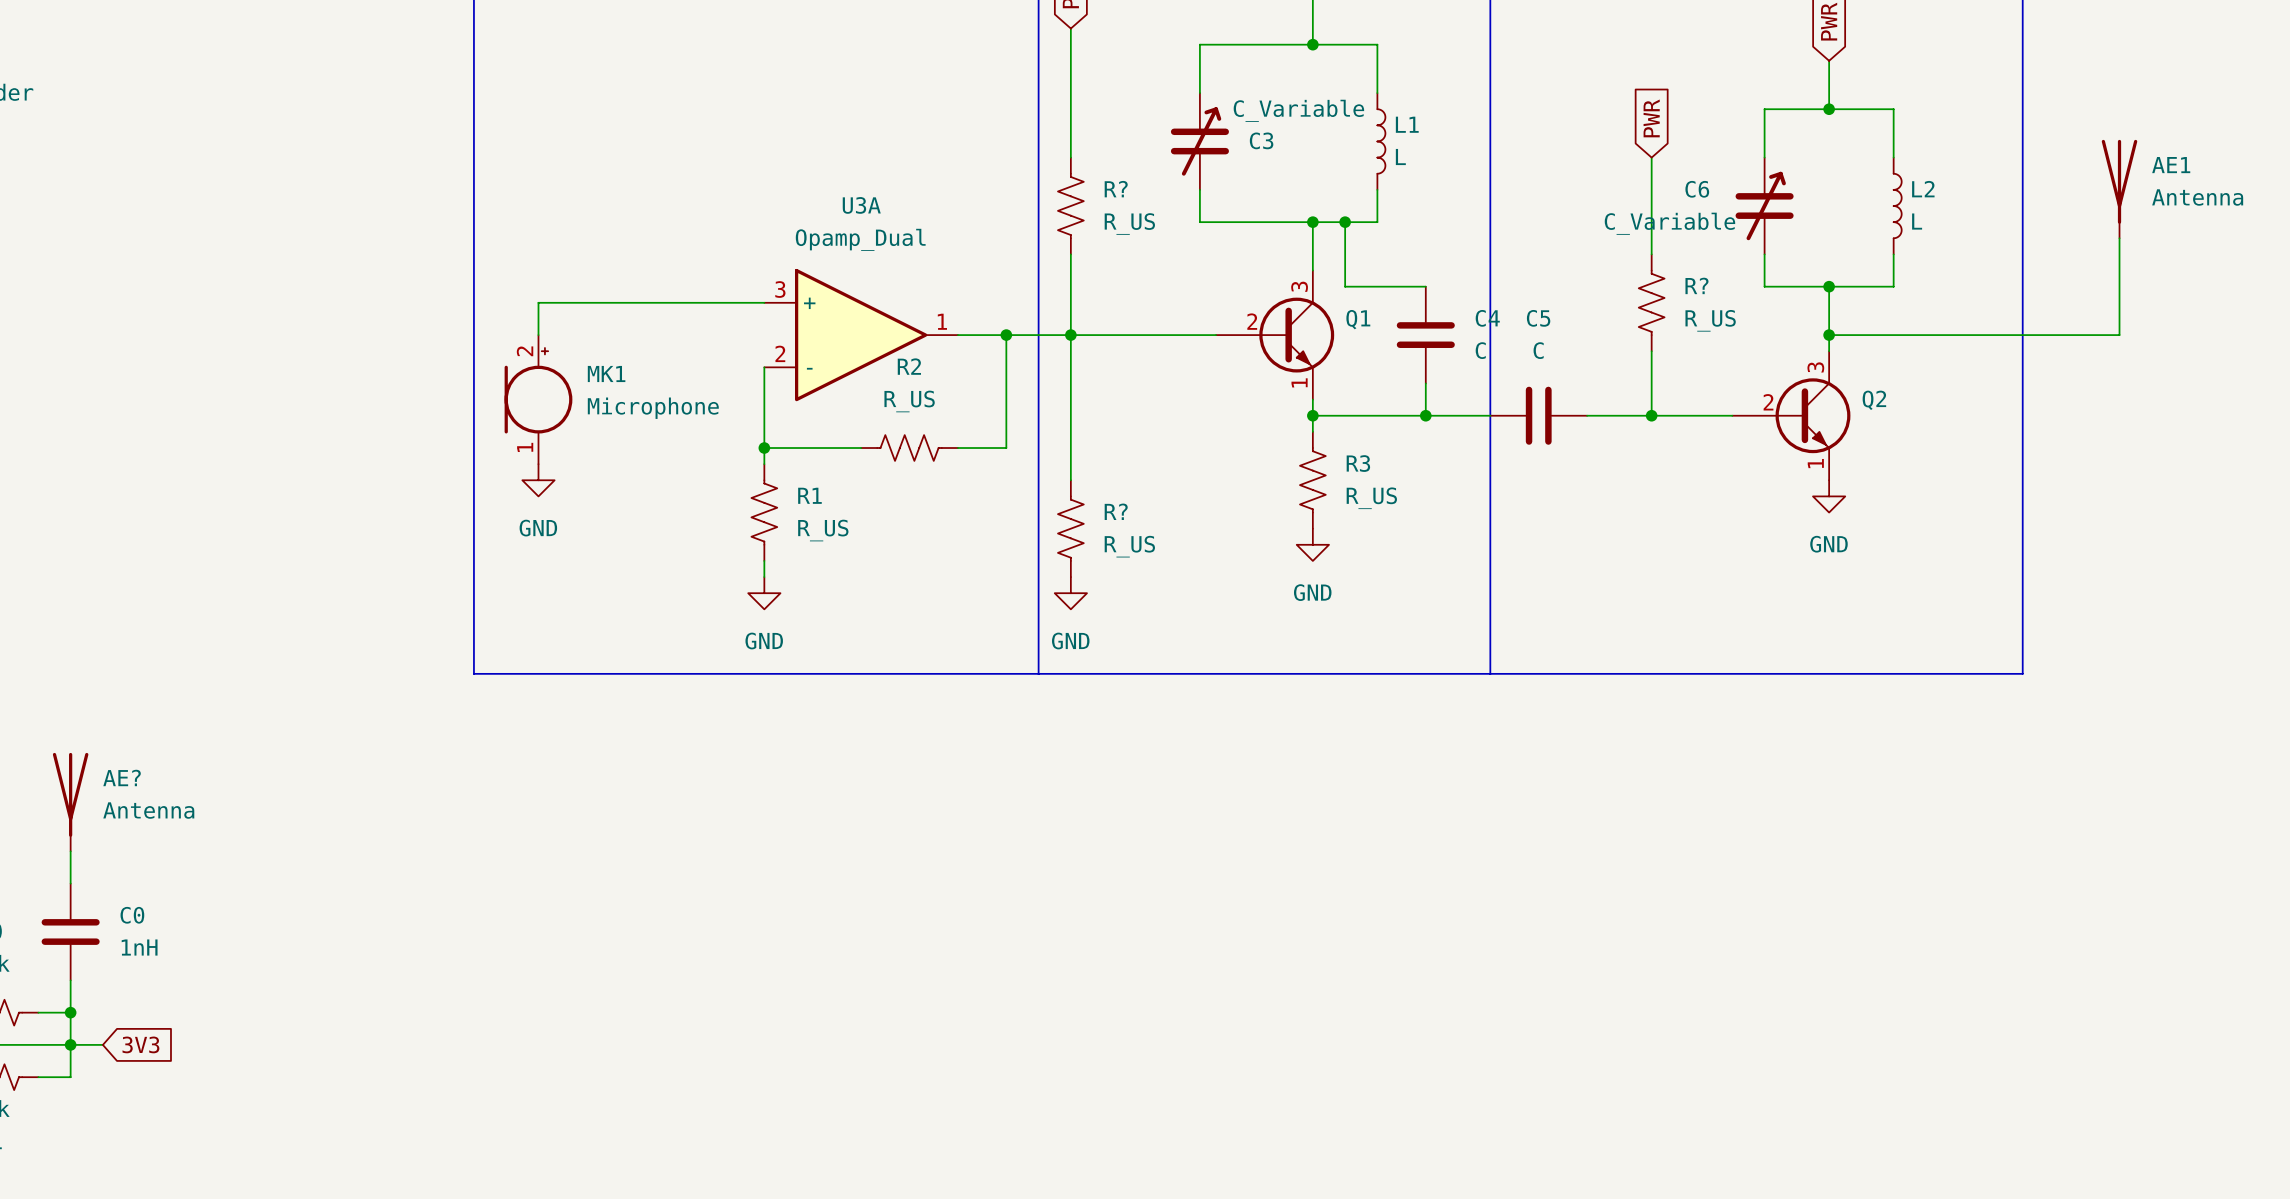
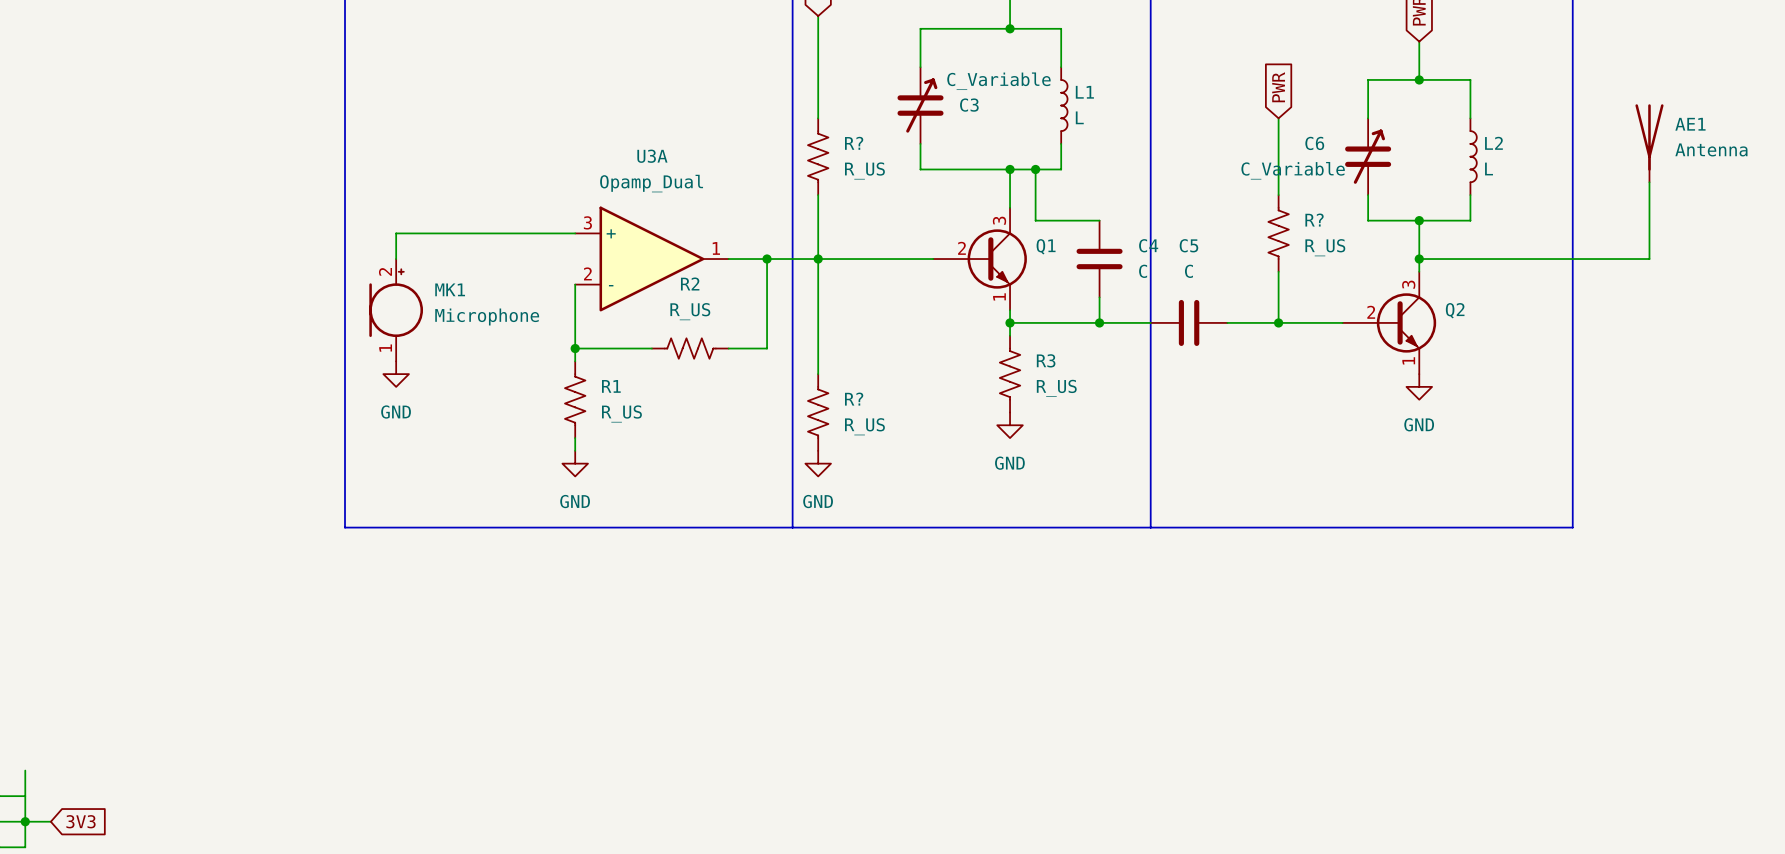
AE?: Antenna (70, 802) -> none
wire: (70, 851) (70, 883) -> none
C0: 1nH (70, 931) -> none
junction: (70, 1012) -> none

